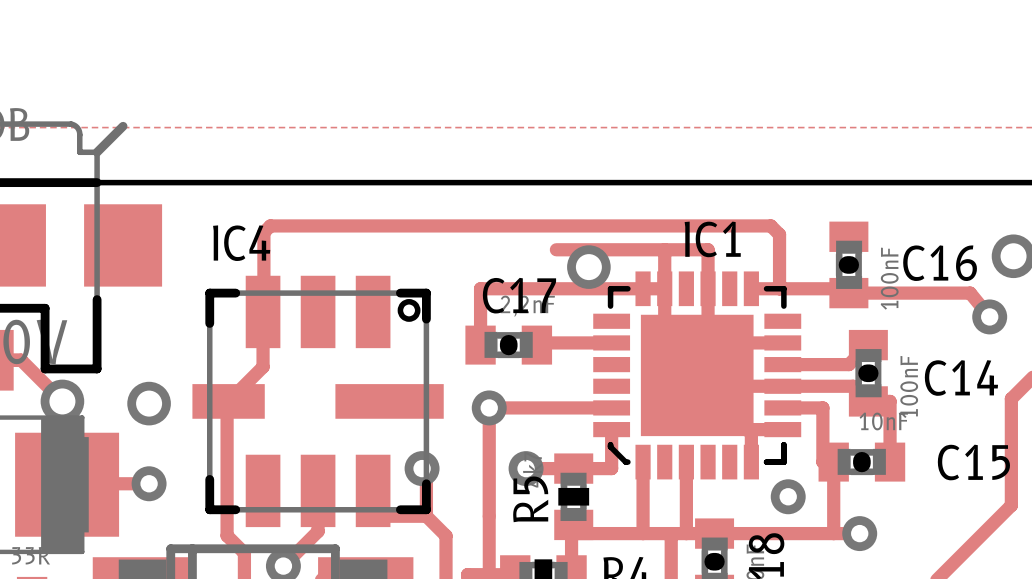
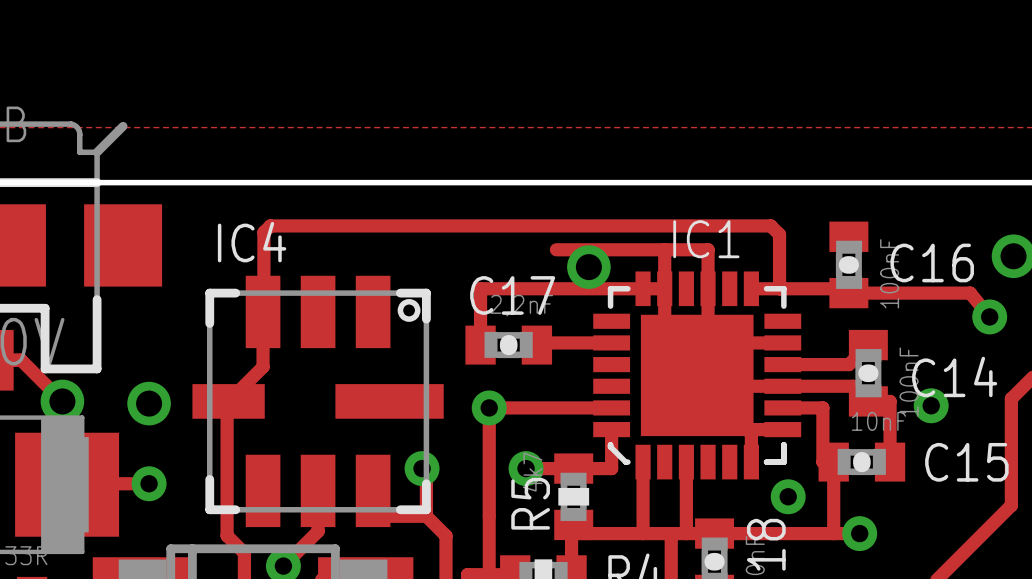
via: none -> (931, 405)

